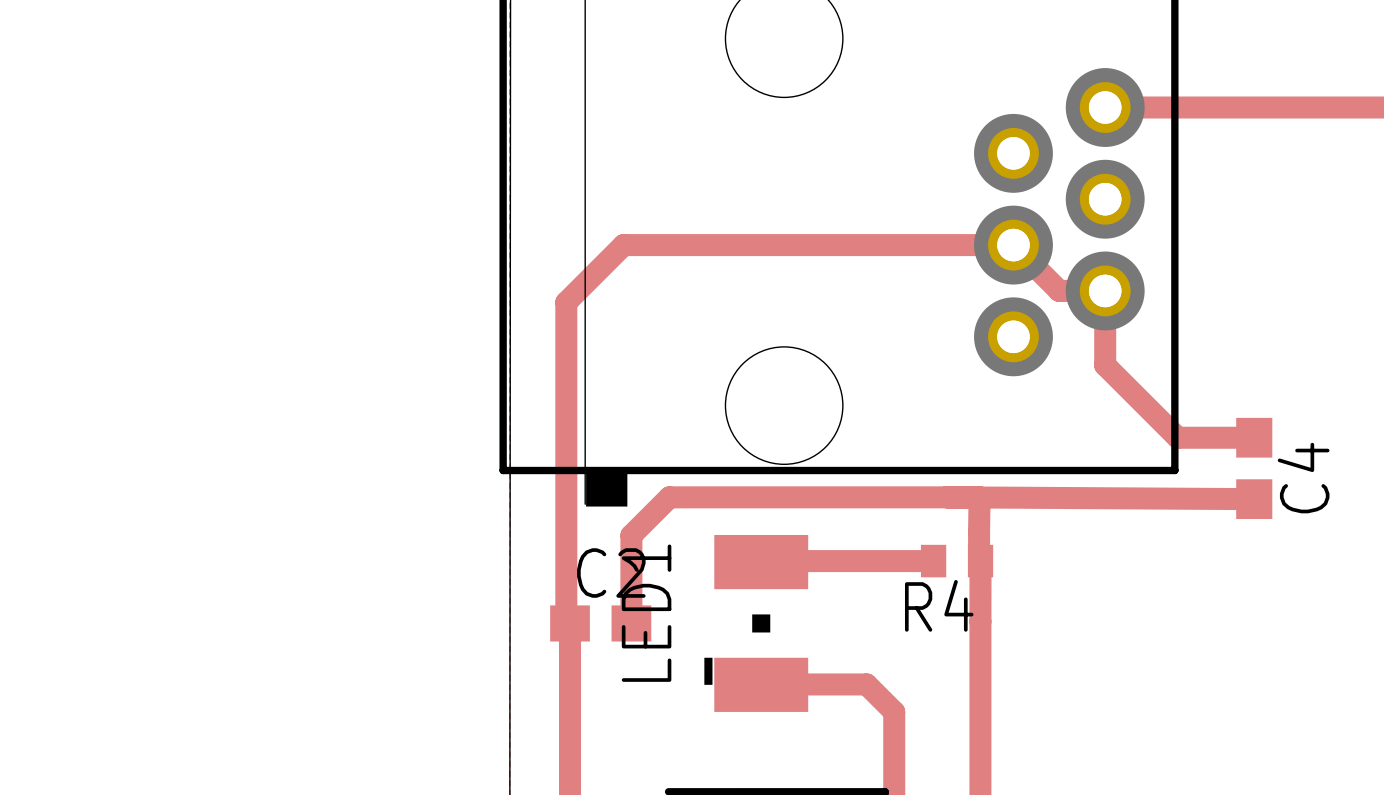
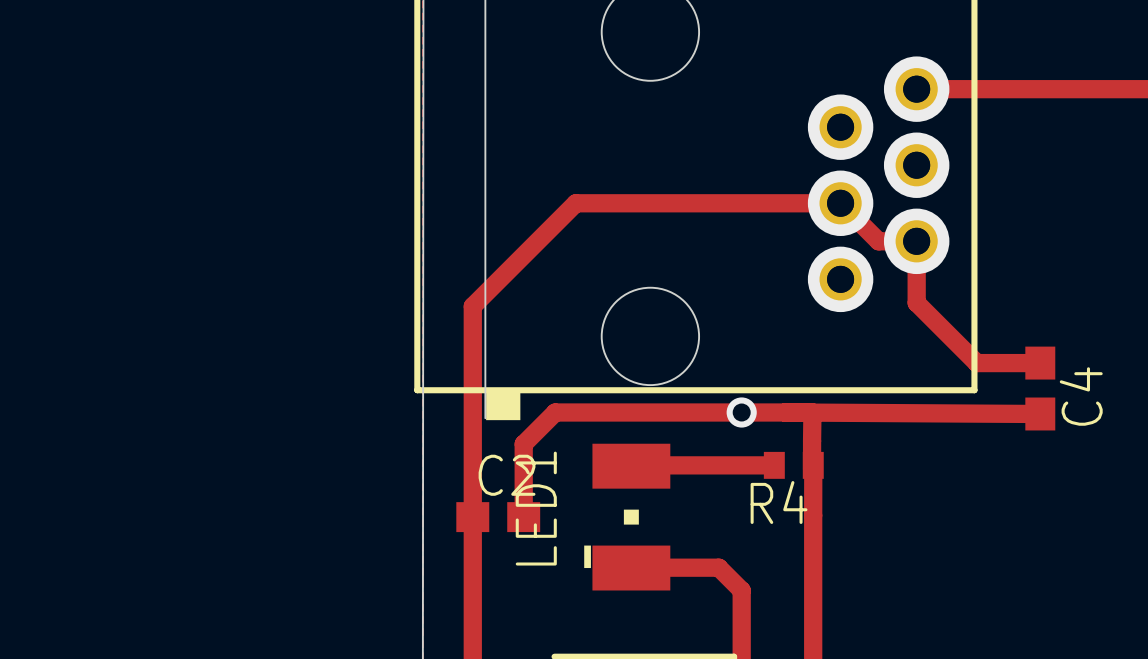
track: (694, 245) (623, 245) (566, 302) (566, 619) (570, 623) -> (575, 203) (472, 306) (472, 517)
via: none -> (741, 412)

